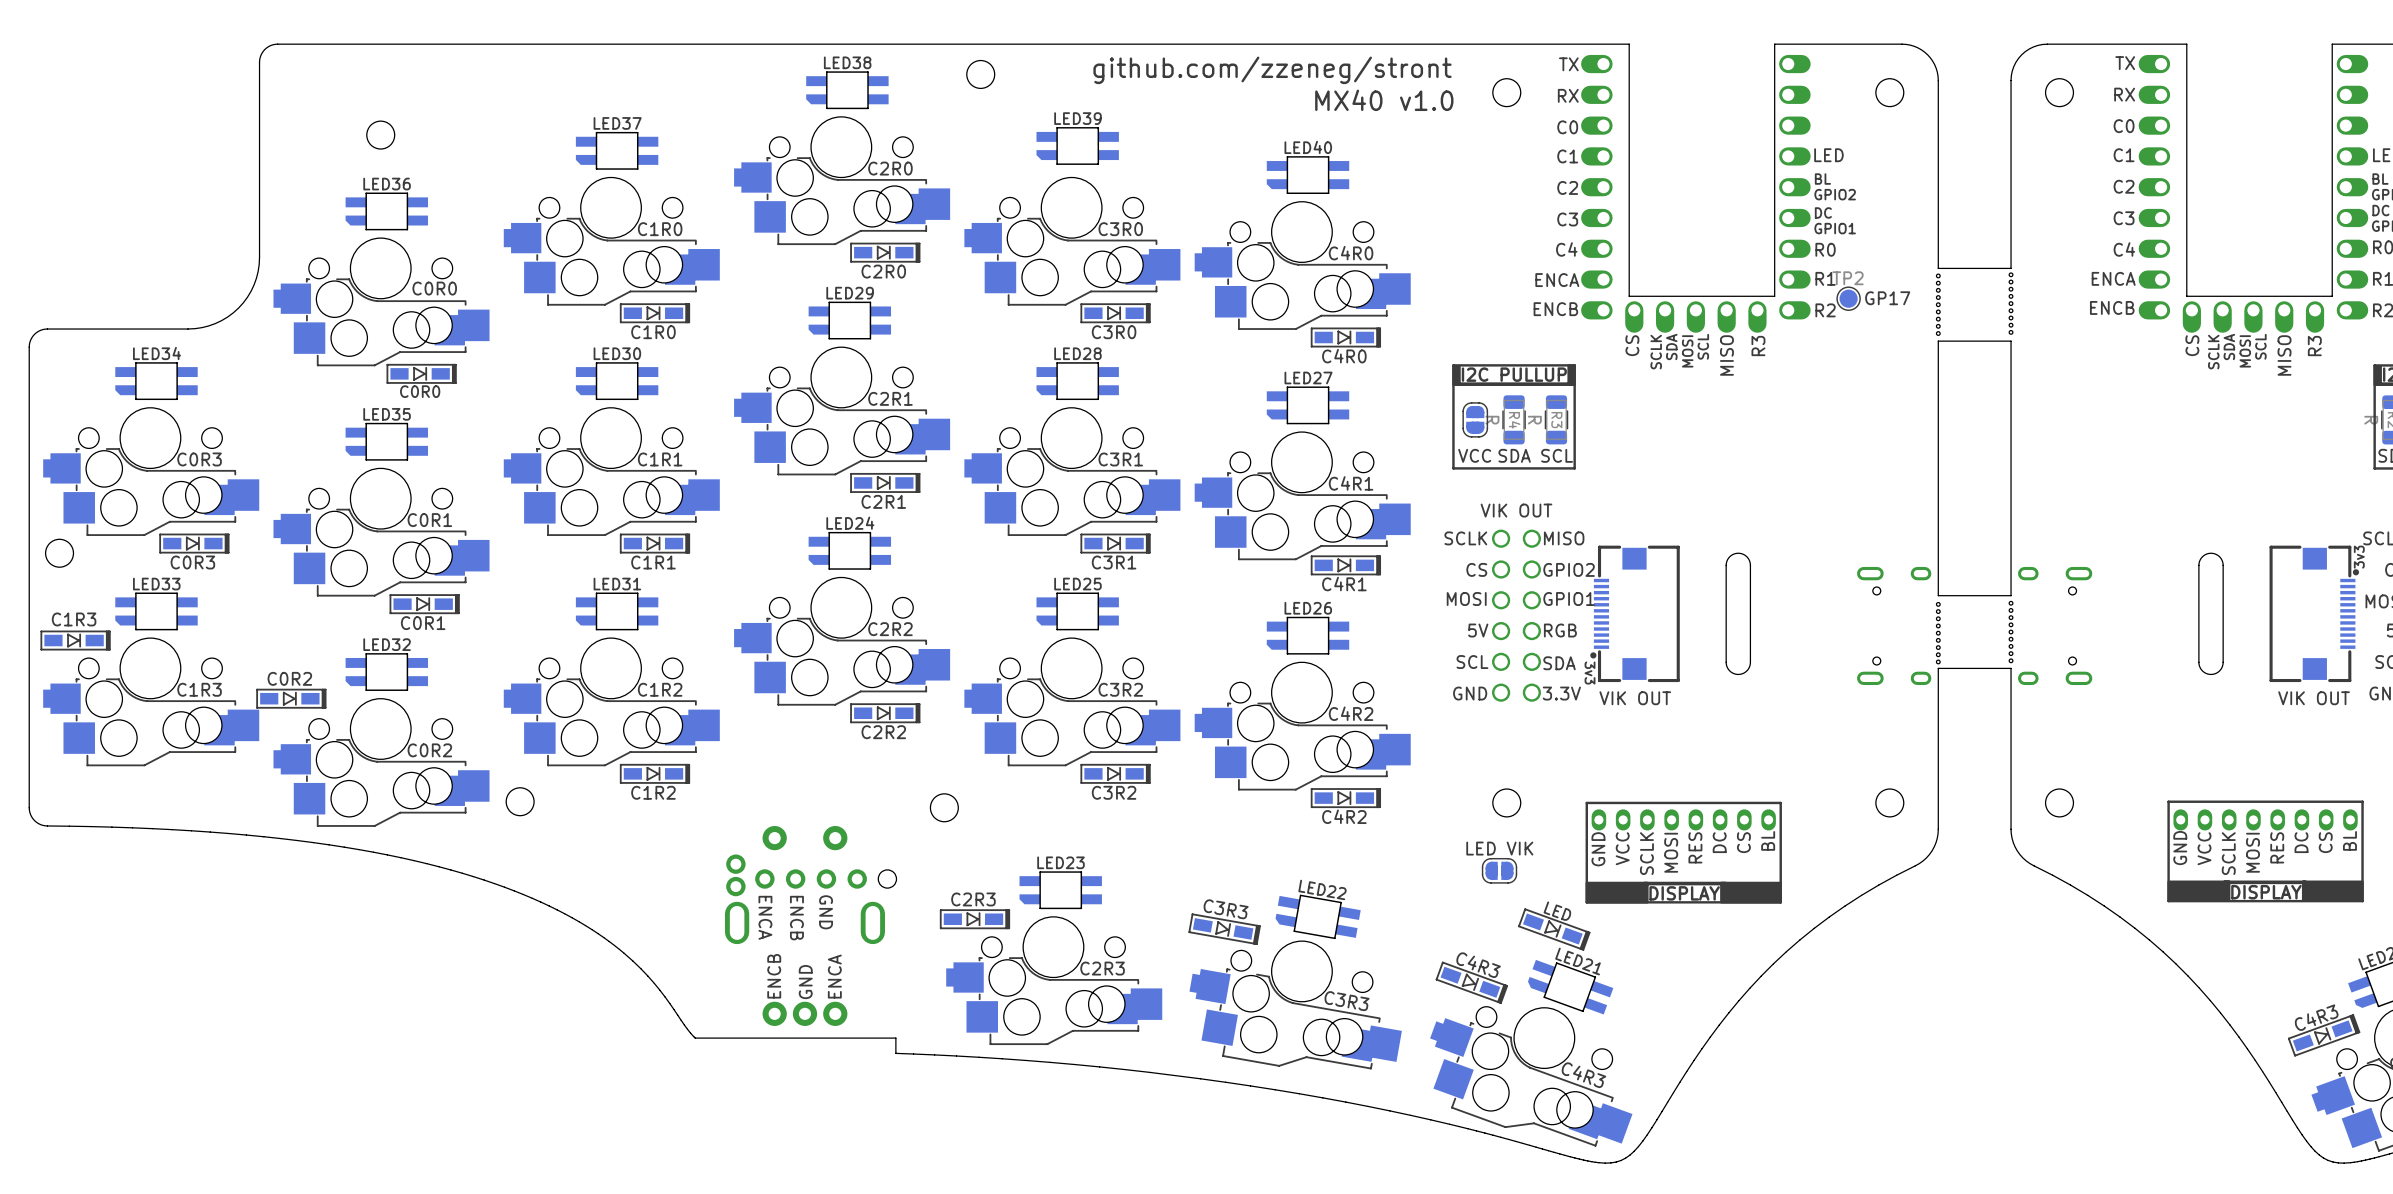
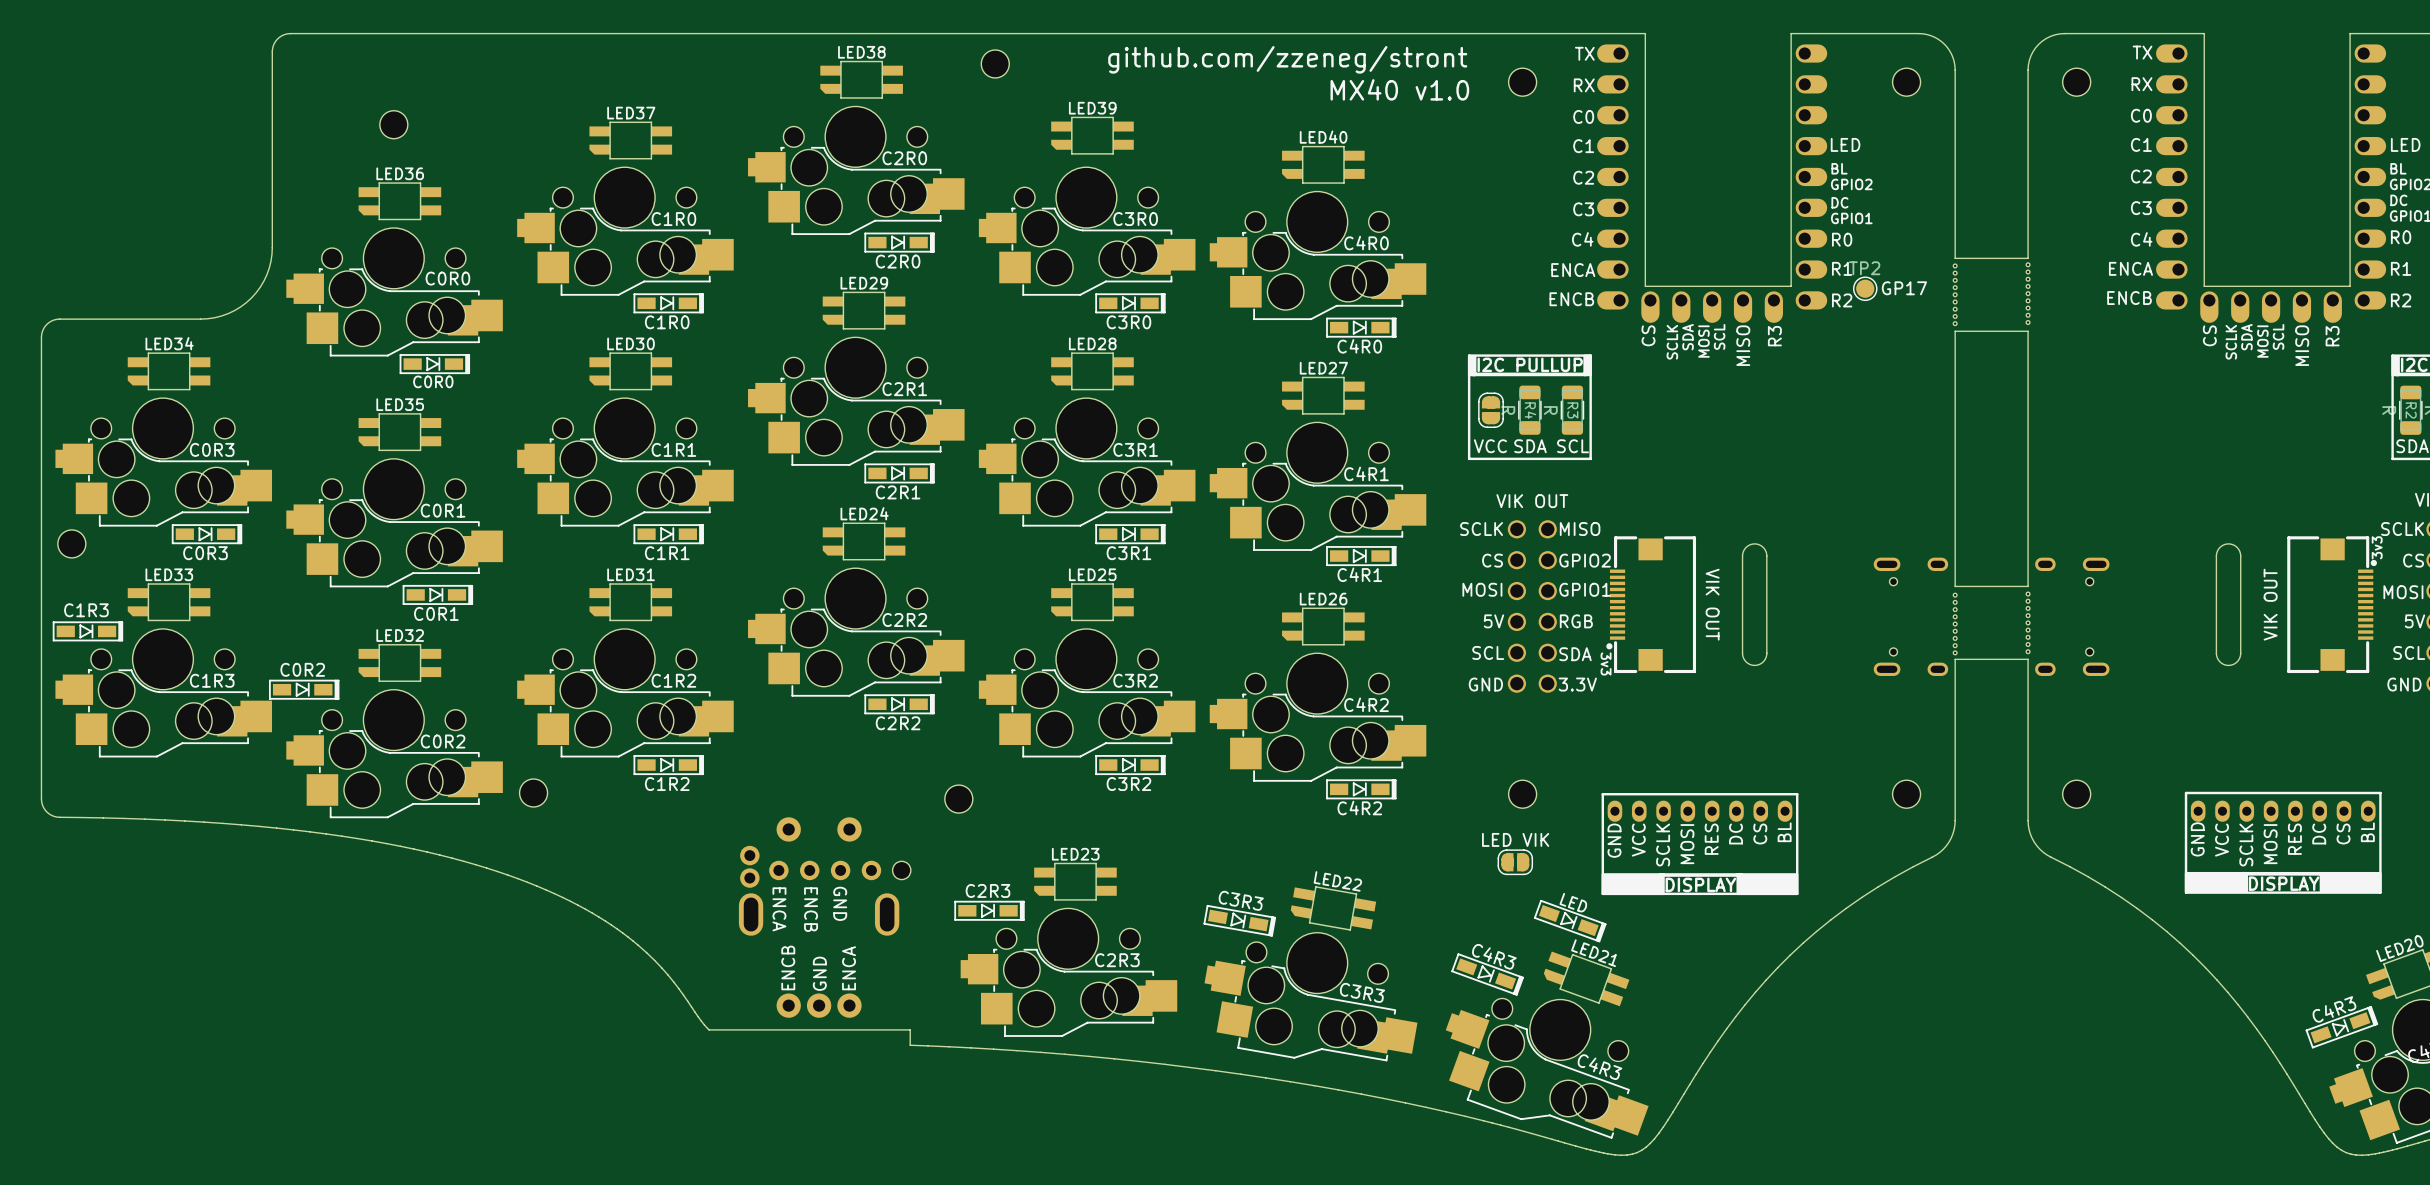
part text rotation: 0° (1635, 698) -> 90° clockwise (1712, 604)
part text position: VIK OUT (1635, 698) -> VIK OUT (1712, 604)
part text rotation: 0° (2314, 698) -> 90° counterclockwise (2270, 604)
part text position: VIK OUT (2314, 698) -> VIK OUT (2270, 604)

